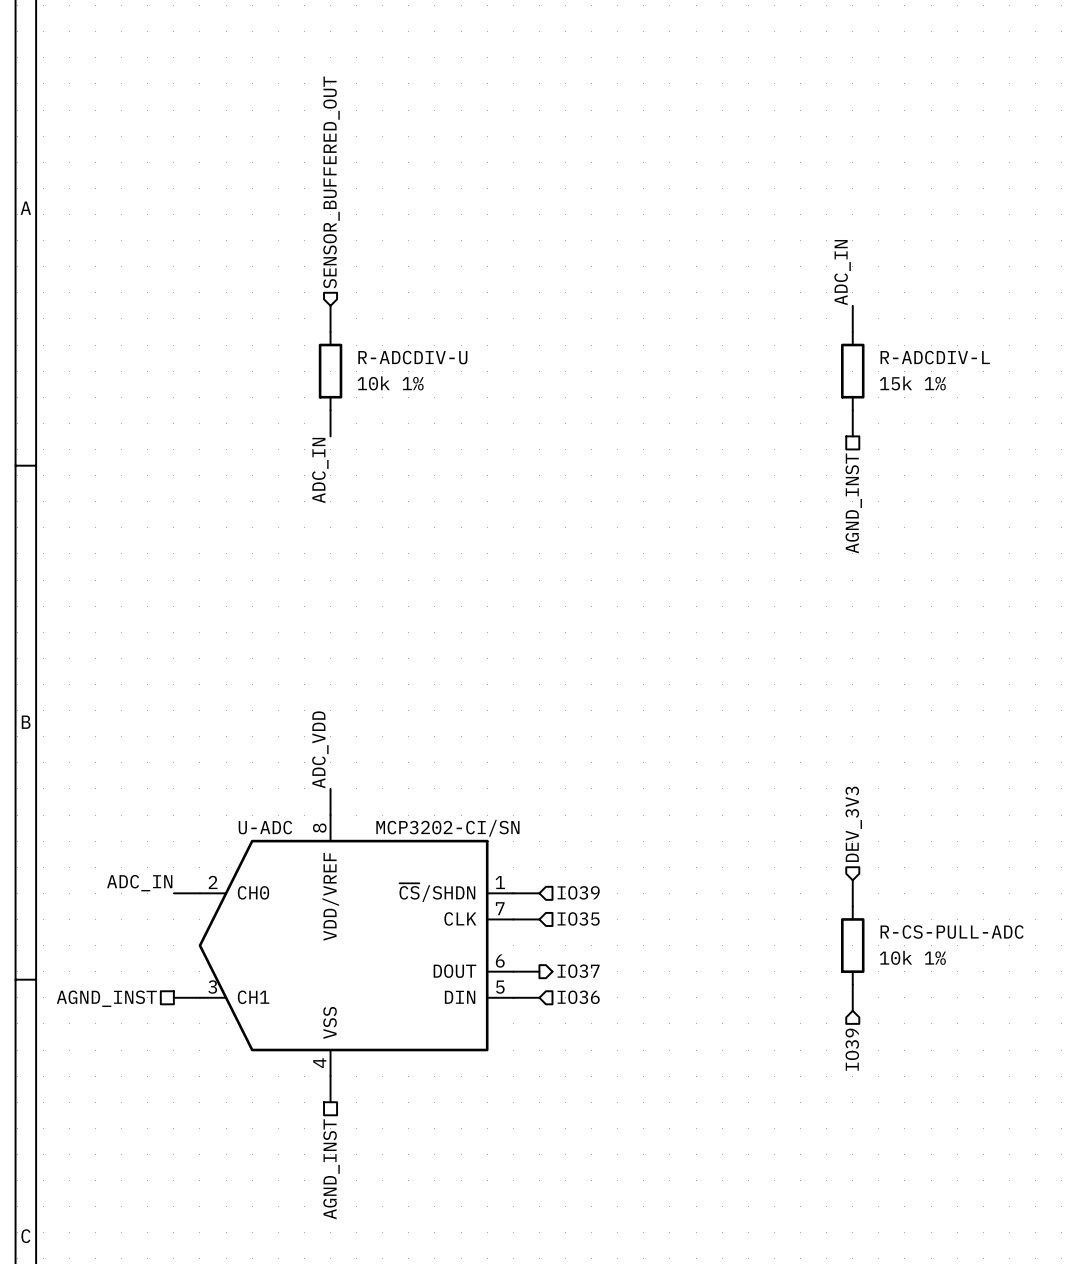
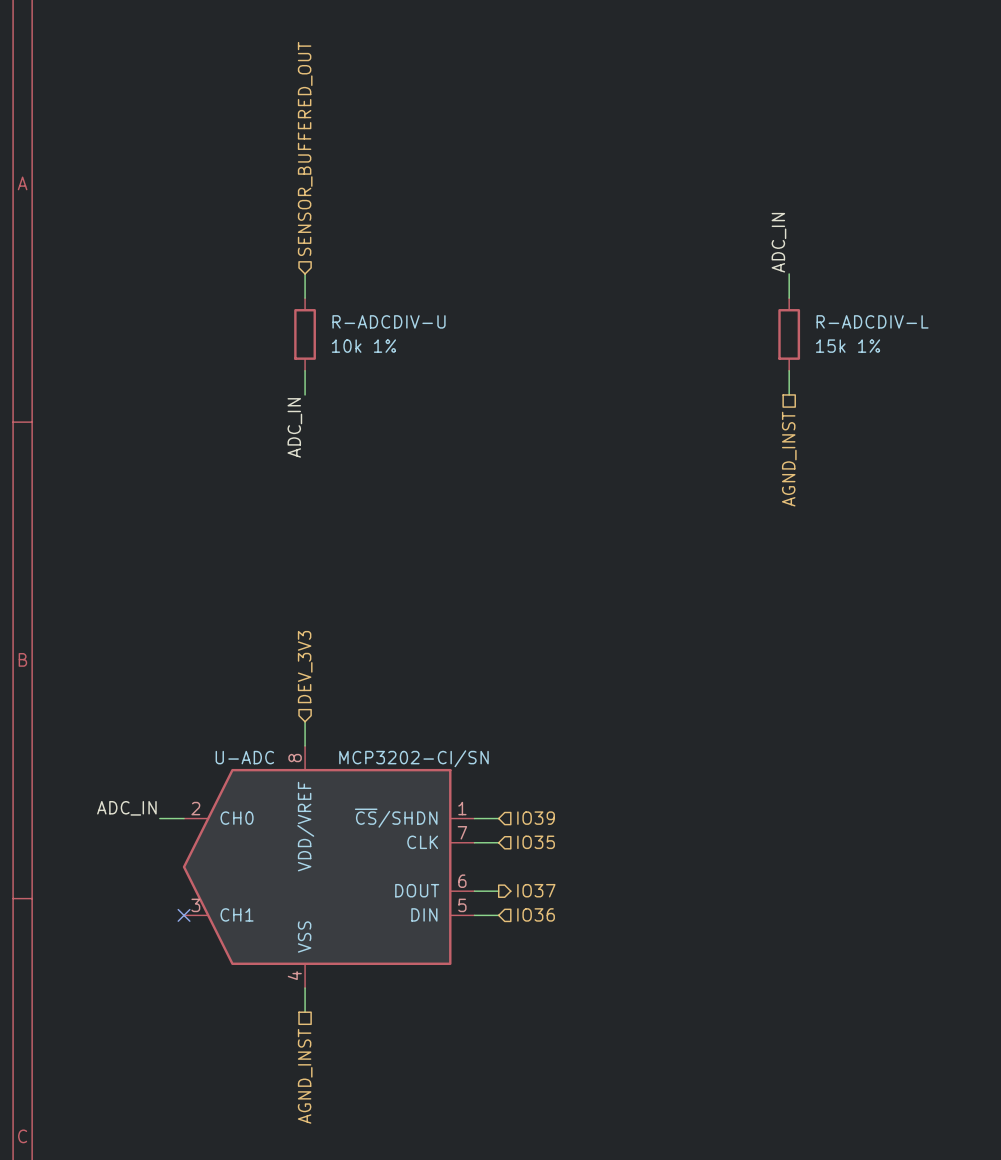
hierarchical label: none -> DEV_3V3 (305, 667)
label: ADC_VDD (320, 749) -> none
hierarchical label: DEV_3V3 (853, 824) -> none
wire: (852, 880) (852, 906) -> none
R-CS-PULL-ADC: 10k 1% (852, 945) -> none
wire: (852, 984) (852, 1010) -> none
wire: (173, 997) (199, 997) -> none
no-connect mark: none -> (184, 915)
hierarchical label: AGND_INST (106, 998) -> none
hierarchical label: IO39 (852, 1049) -> none

